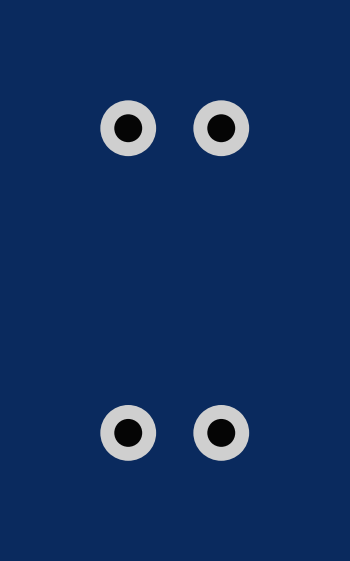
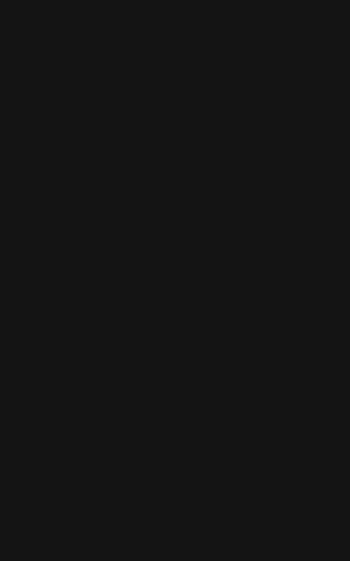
part: (174, 128) -> none
part: (174, 432) -> none

